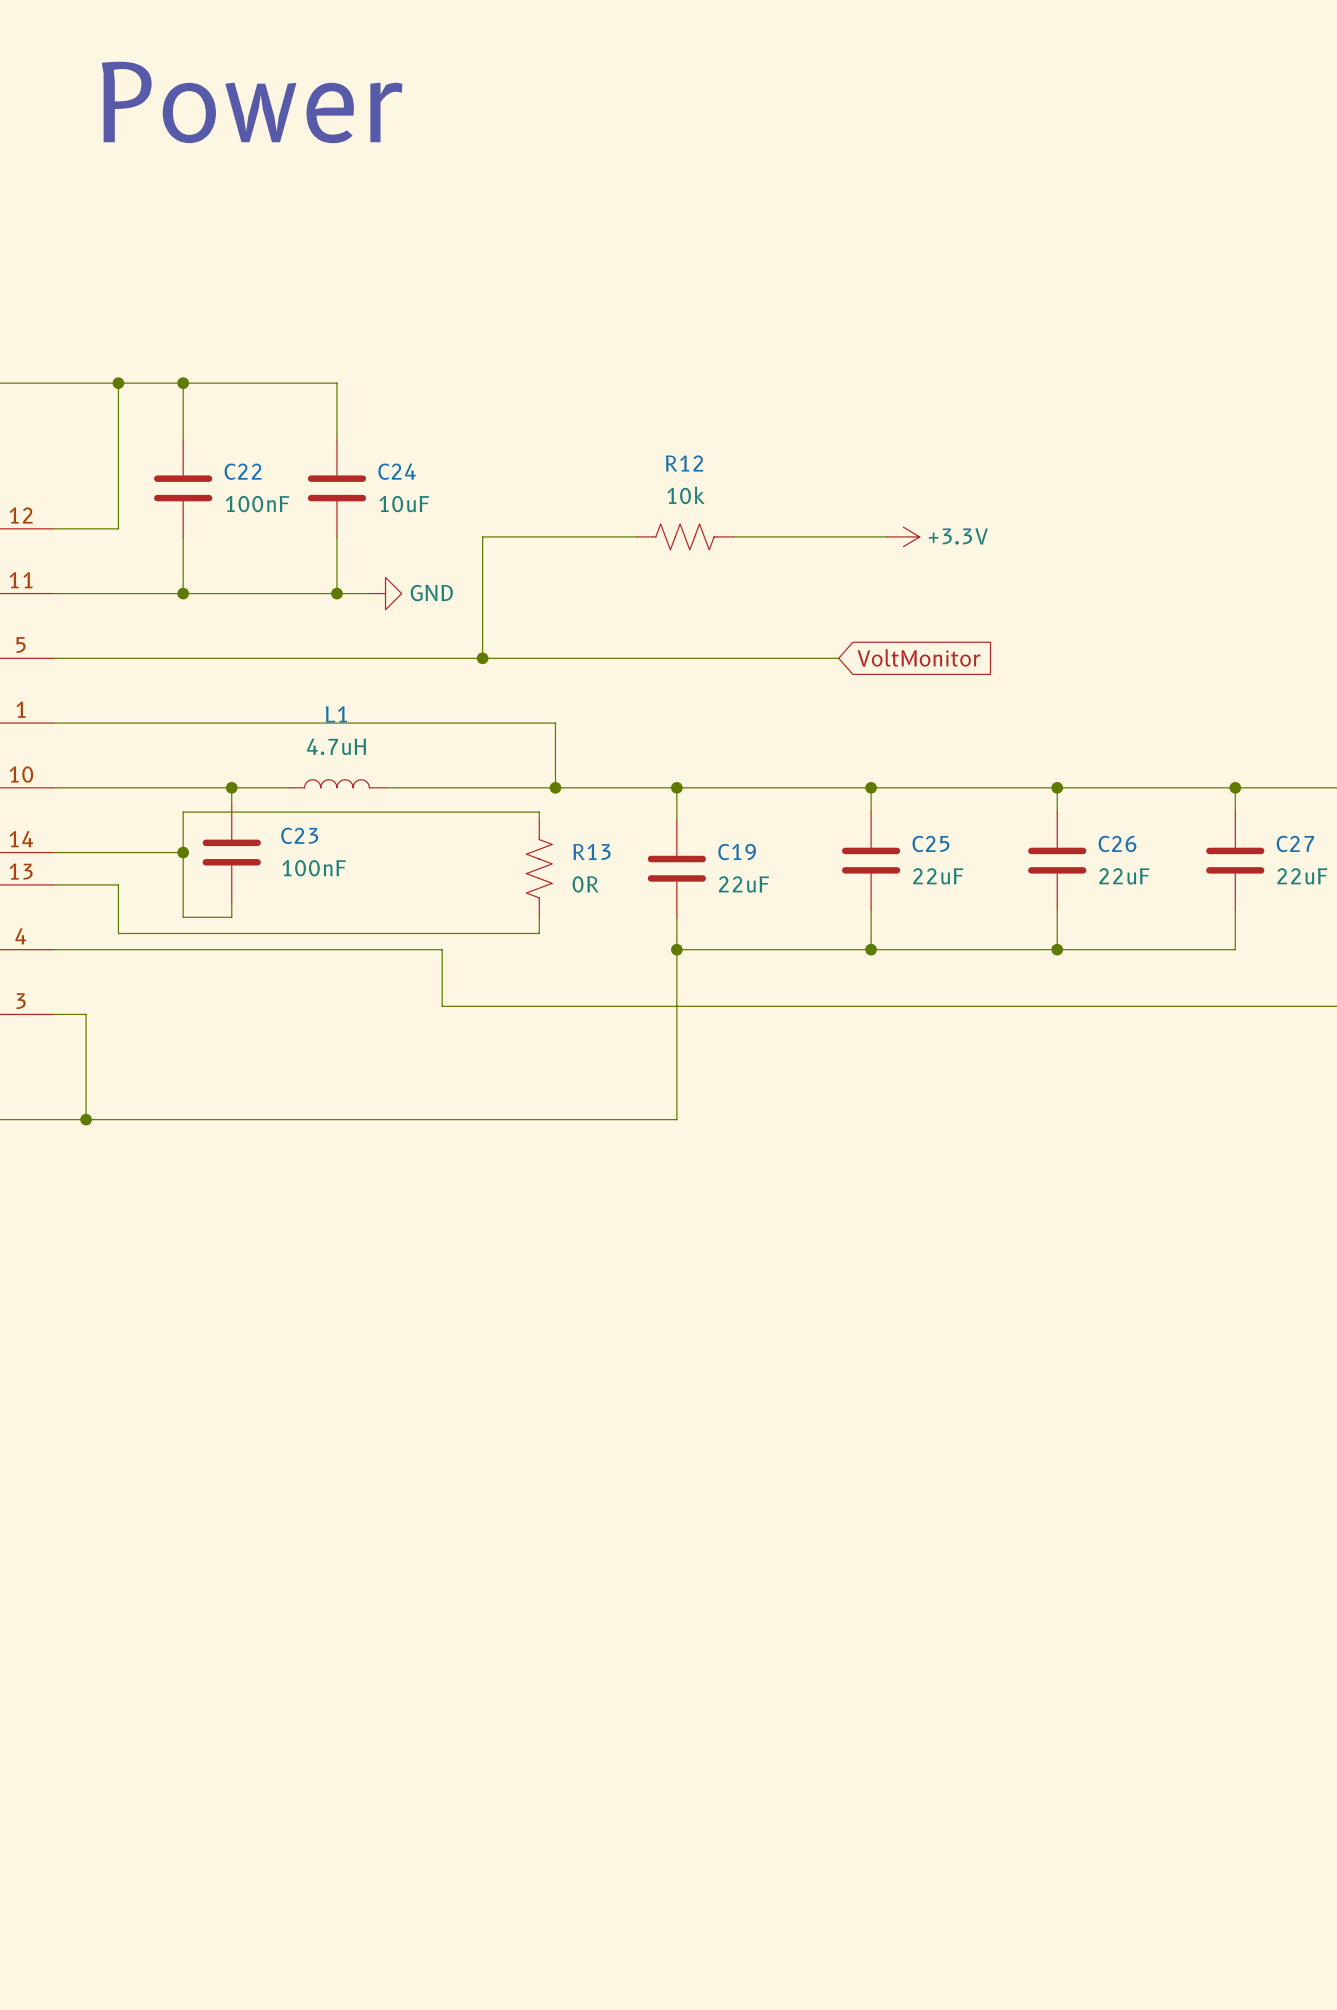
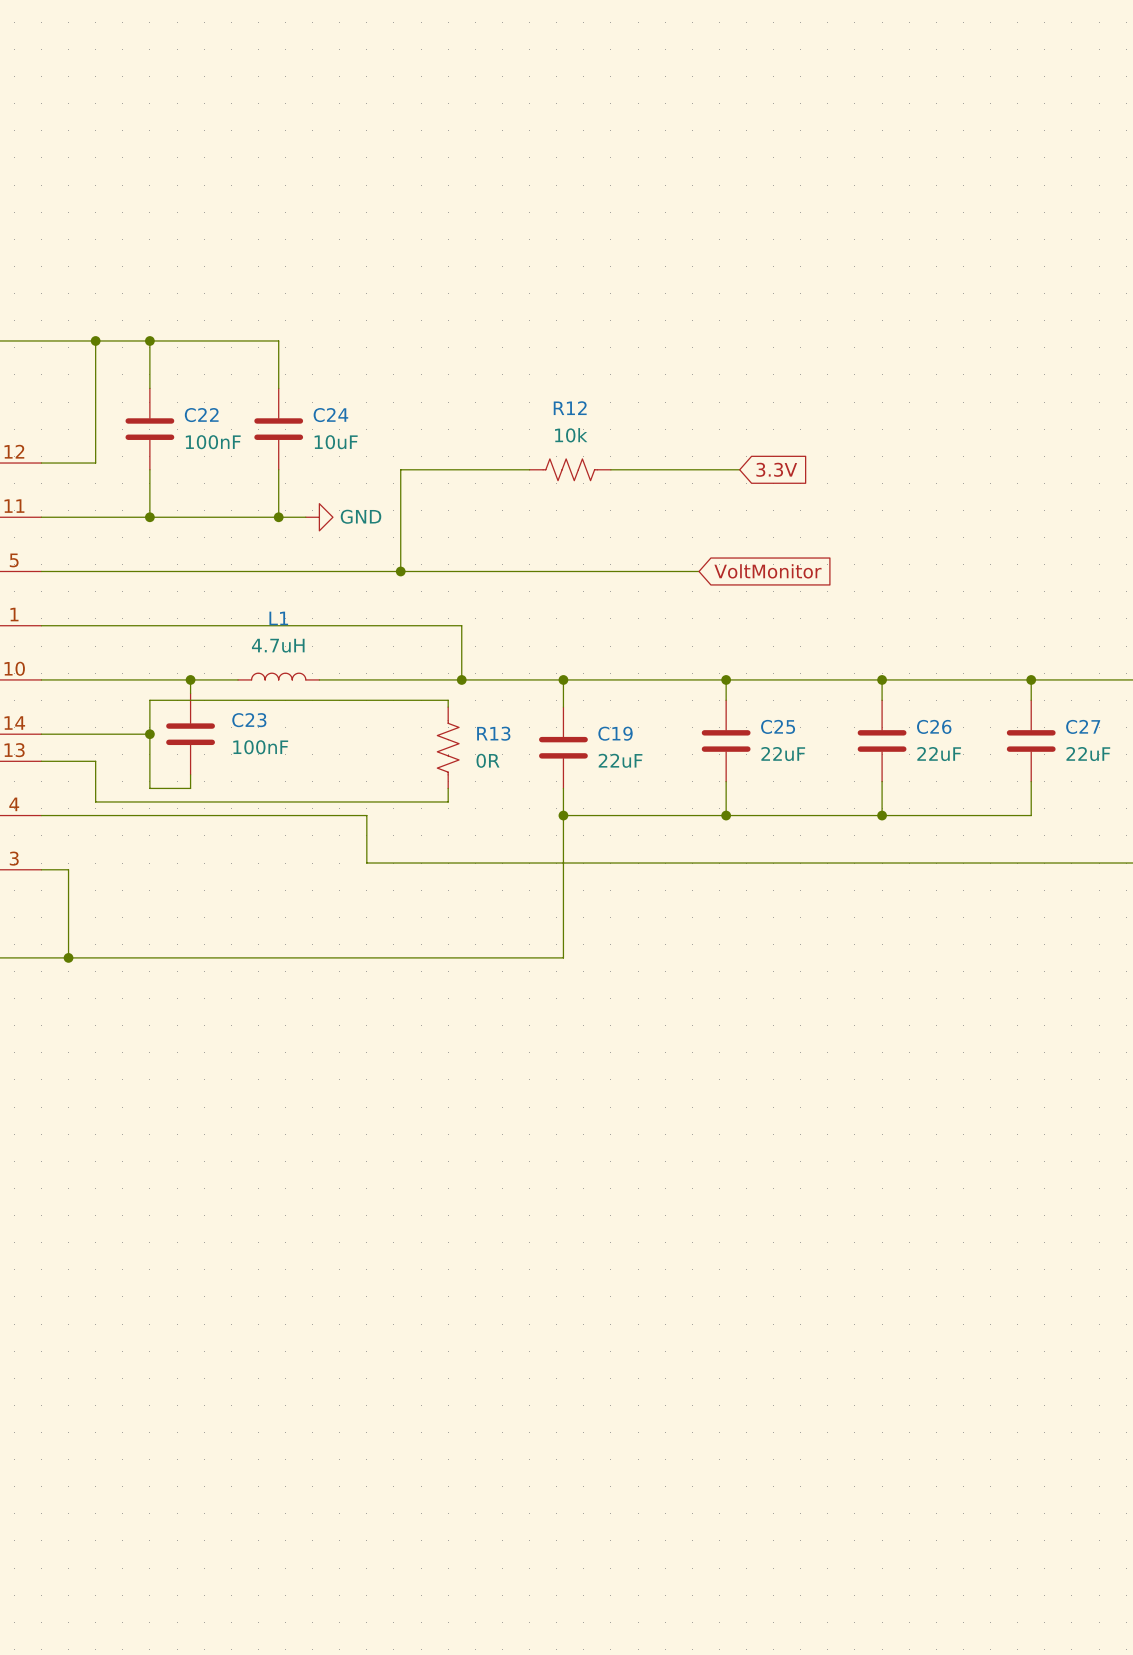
text: Power (252, 102) -> none
power symbol: +3.3V (903, 536) -> none
global label: none -> 3.3V (776, 469)

